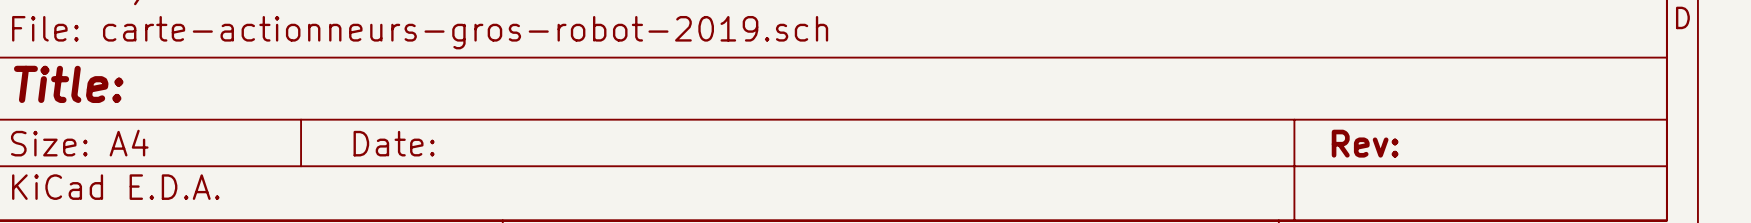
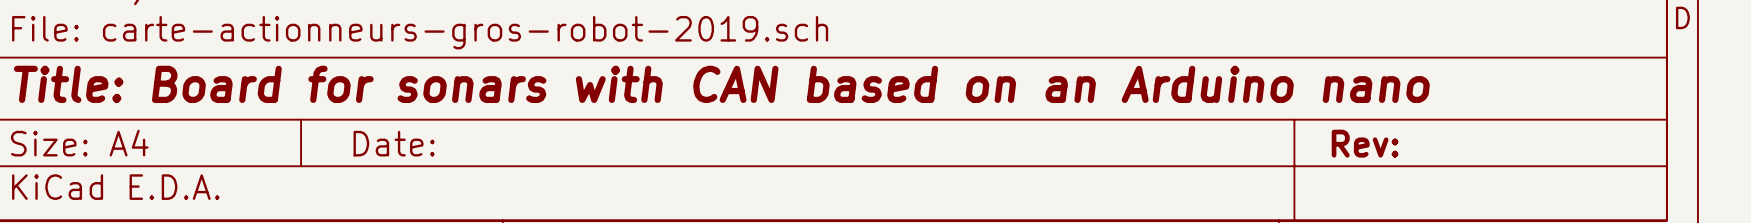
title block: Title: (68, 84) -> Title: Board for sonars with CAN based on an Arduino nano (721, 84)

